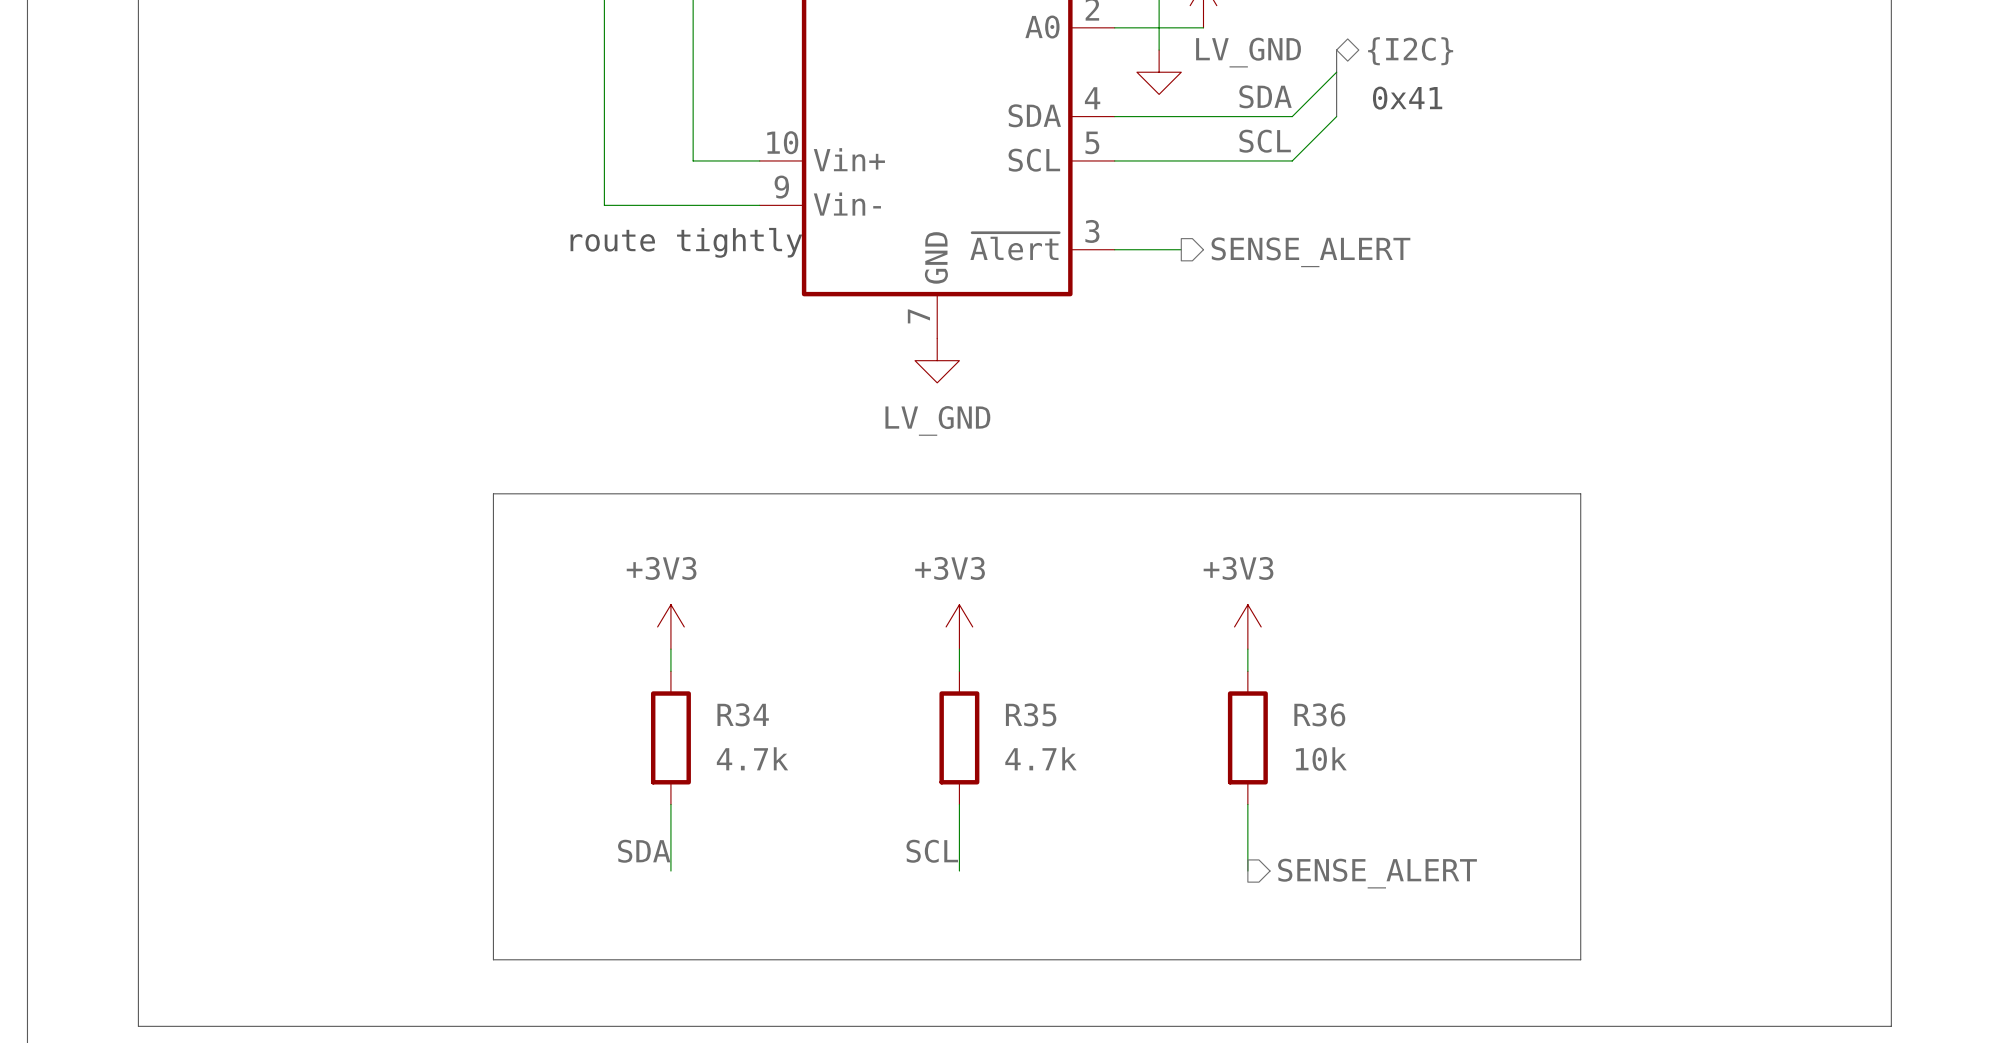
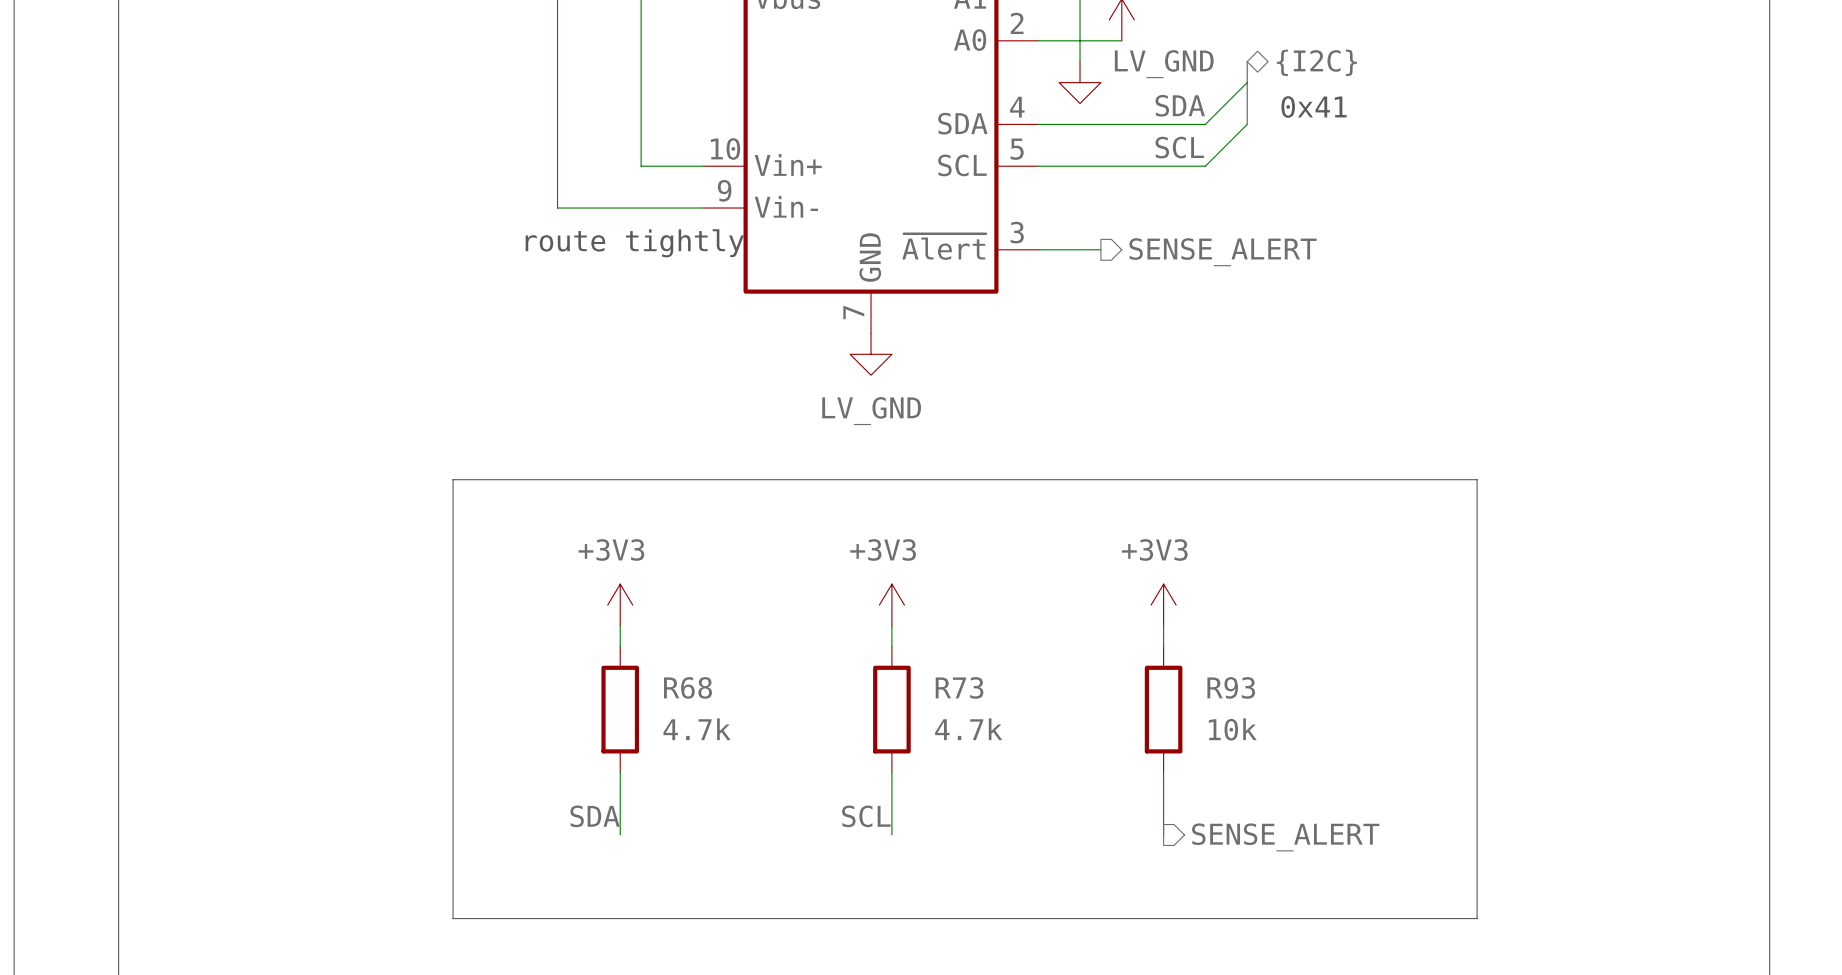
R34 name: R34 (743, 714) -> R68 (688, 687)
R35 name: R35 (1031, 714) -> R73 (959, 687)
R36 name: R36 (1319, 714) -> R93 (1231, 687)

